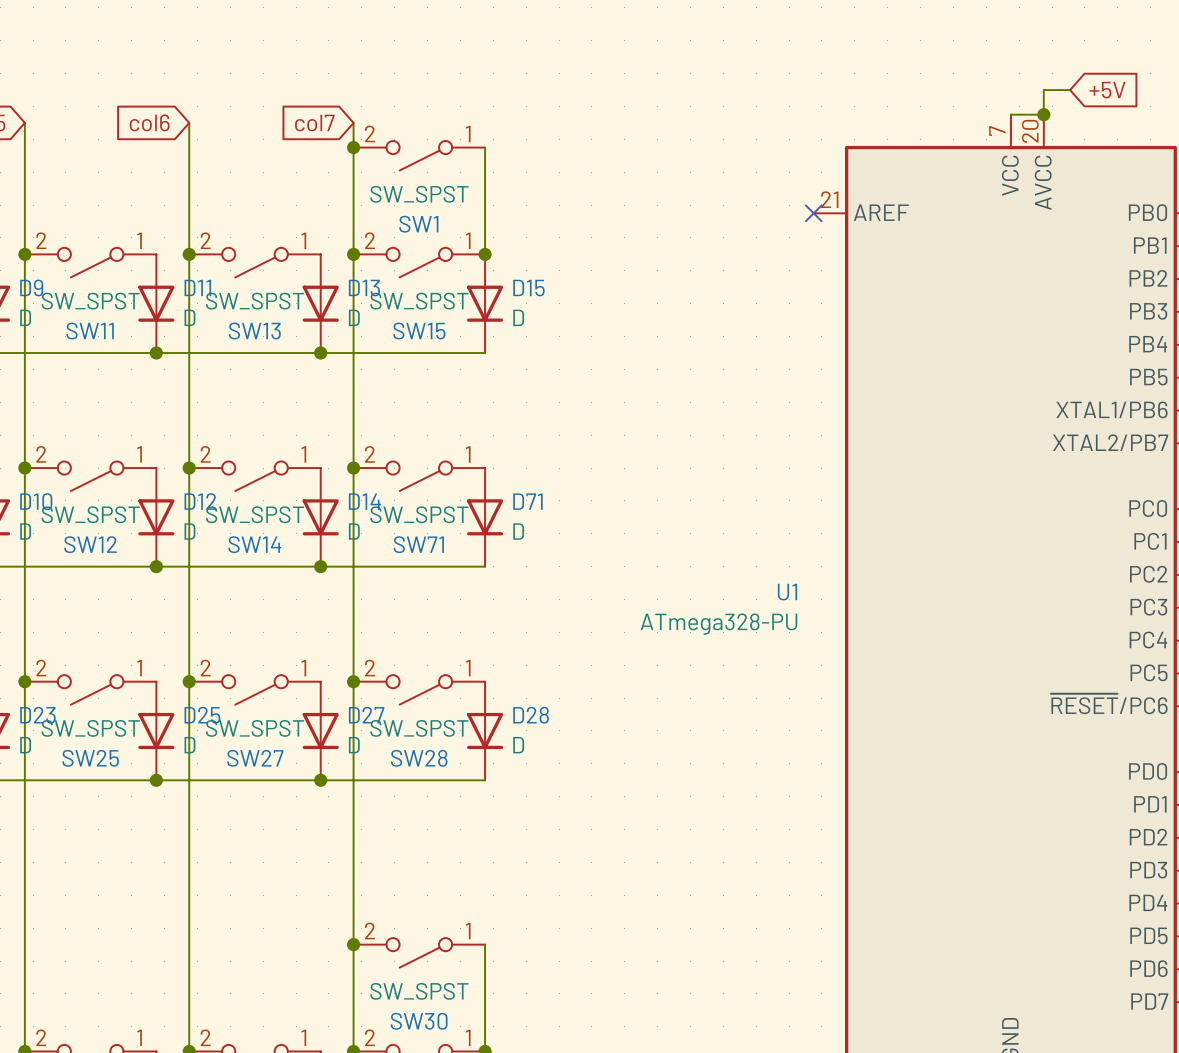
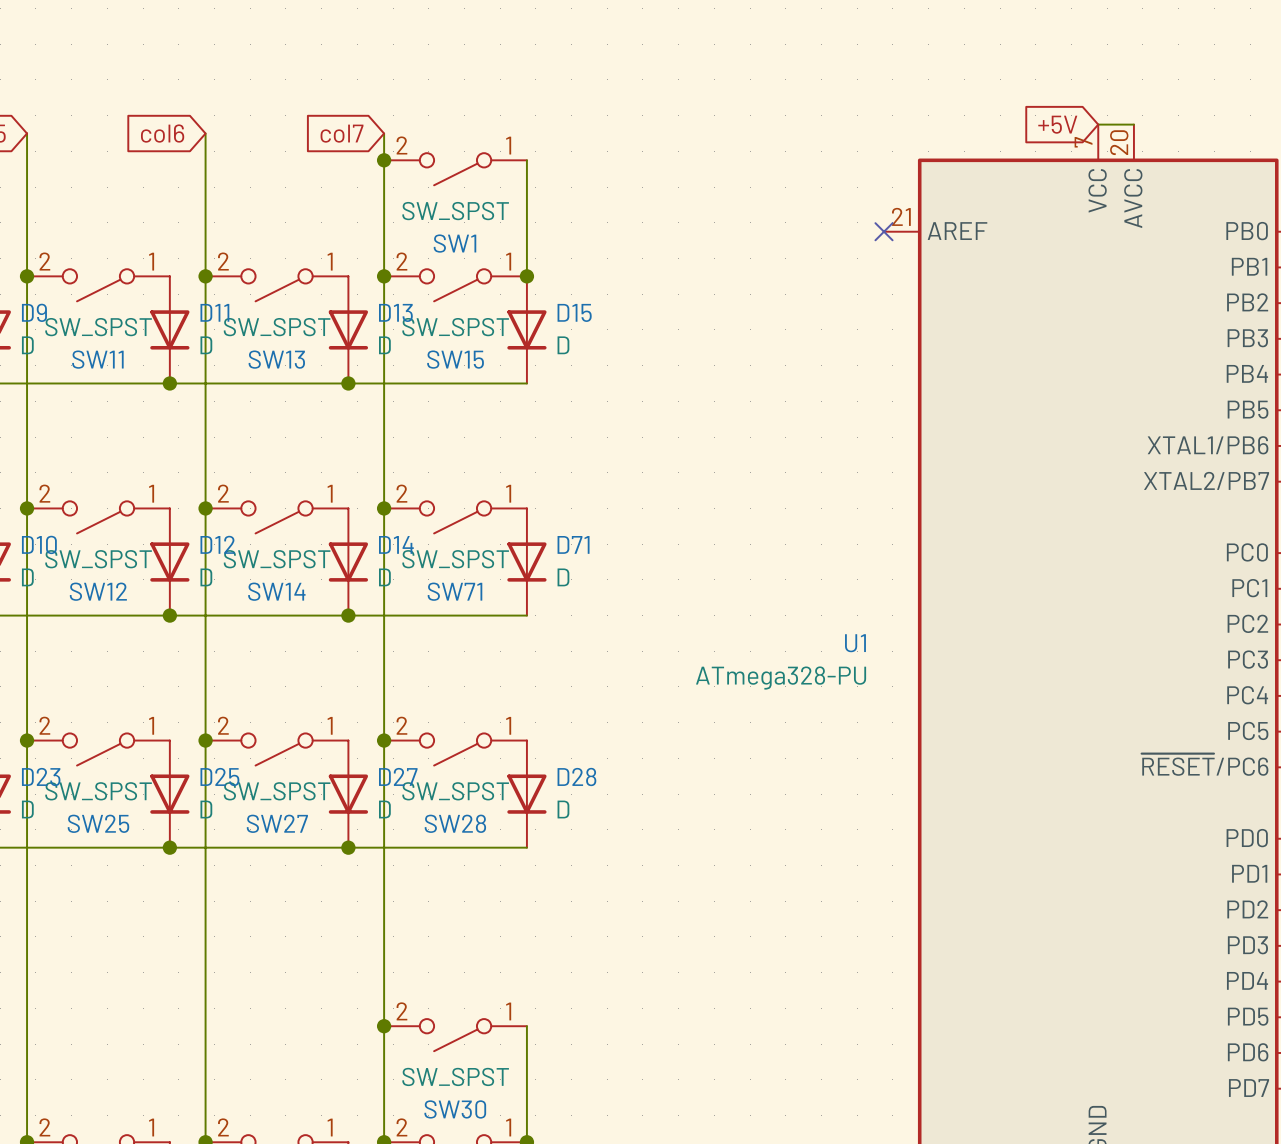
wire: (1070, 90) (1043, 90) (1043, 114) -> none
global label rotation: 0° (1107, 90) -> 180° (1057, 124)
global label position: +5V (1107, 90) -> +5V (1057, 124)
junction: (1043, 114) -> none

